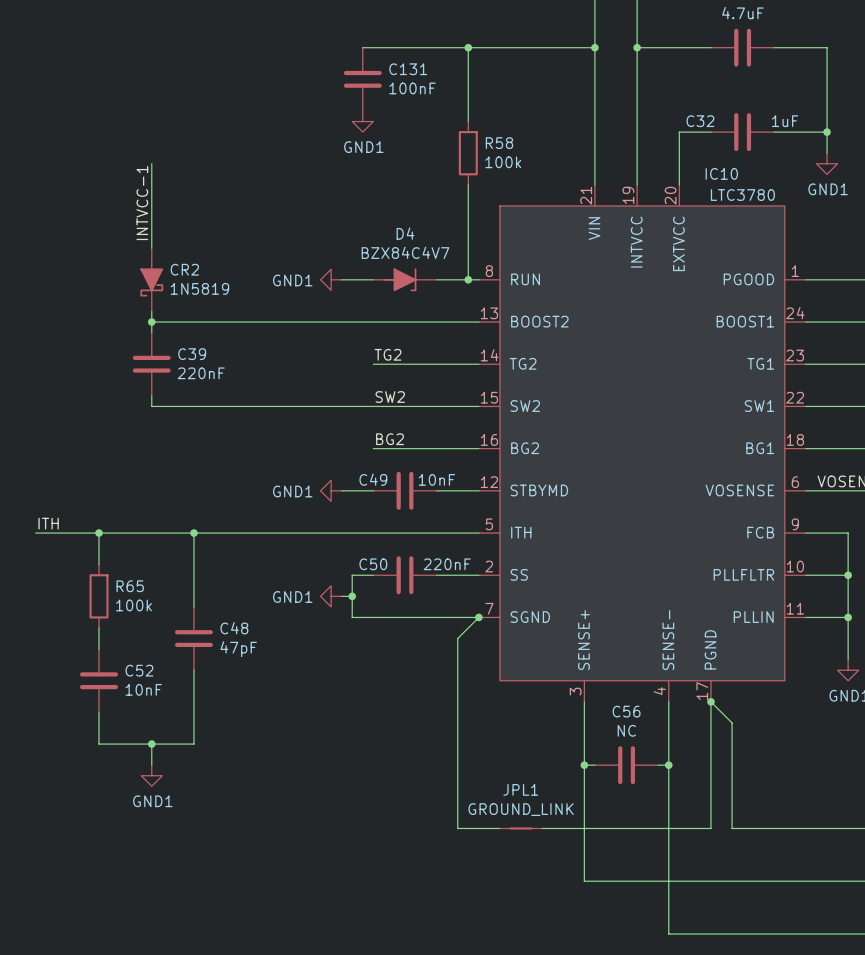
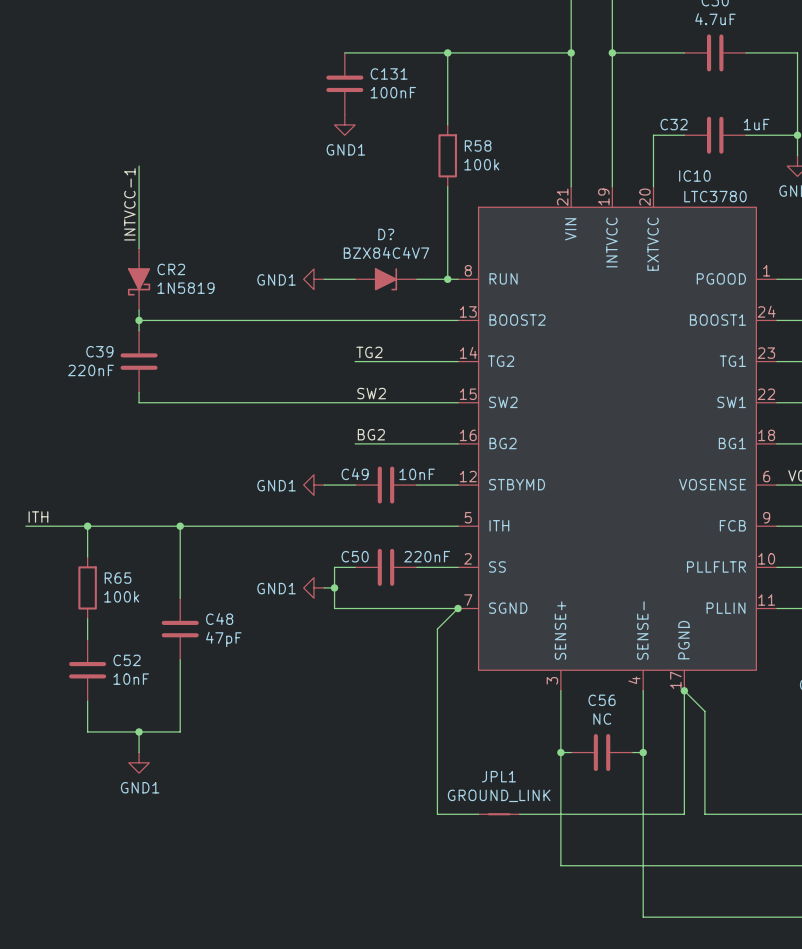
D4: BZX84C4V7 (404, 279) -> none
D?: none -> BZX84C4V7 (385, 279)
C39 name position: C39 (192, 354) -> C39 (99, 351)
C39 value position: 220nF (201, 373) -> 220nF (91, 370)

